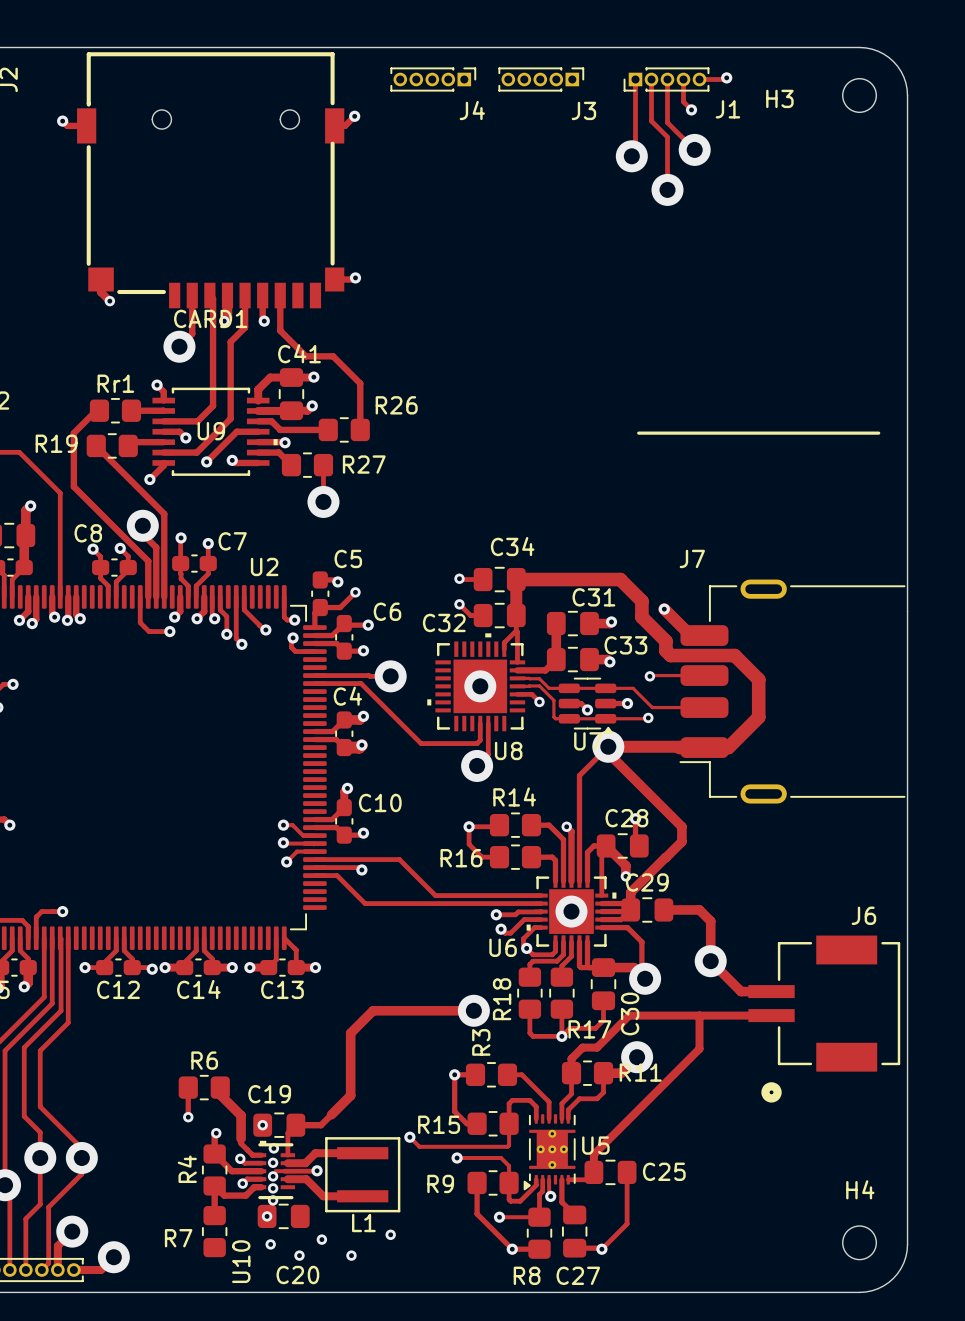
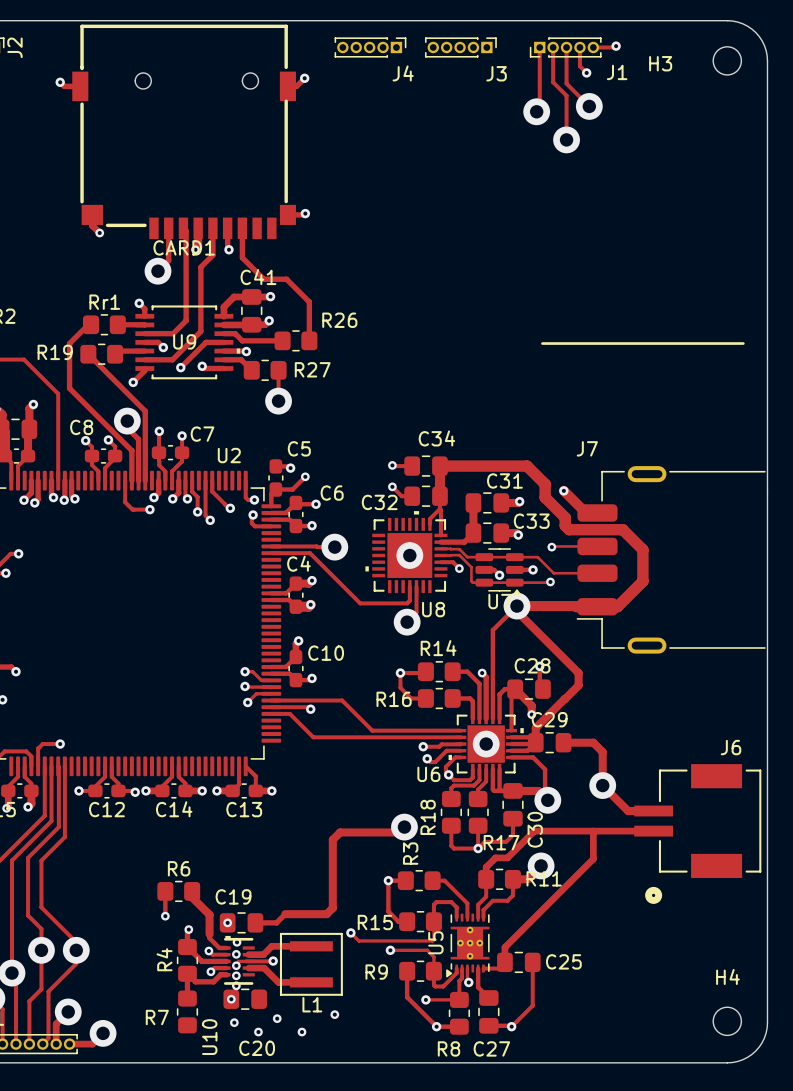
track: (473, 1010) (373, 1010) (350, 1033) (350, 1095) (331, 1114) -> (404, 827) (399, 832) (340, 832) (332, 839) (332, 908) (326, 914) (285, 914)
track: (295, 1125) (287, 1133) (287, 1155) -> none
U5 name rotation: 0° (595, 1145) -> 90° counterclockwise (435, 942)
U5 name position: U5 (595, 1145) -> U5 (435, 942)

